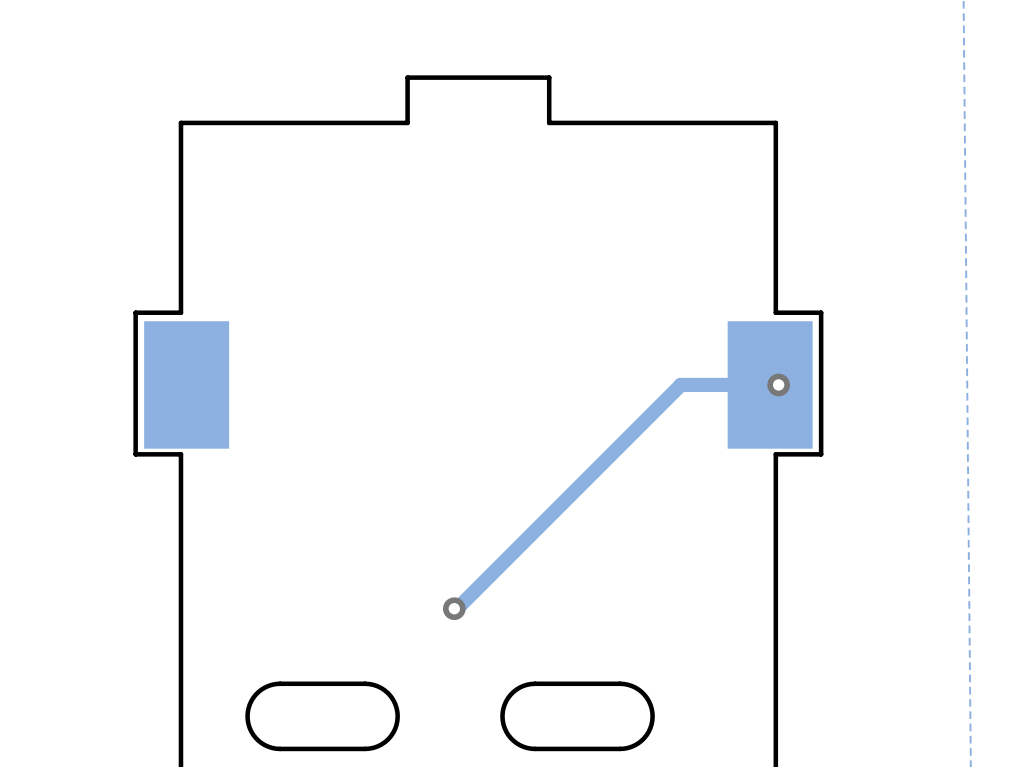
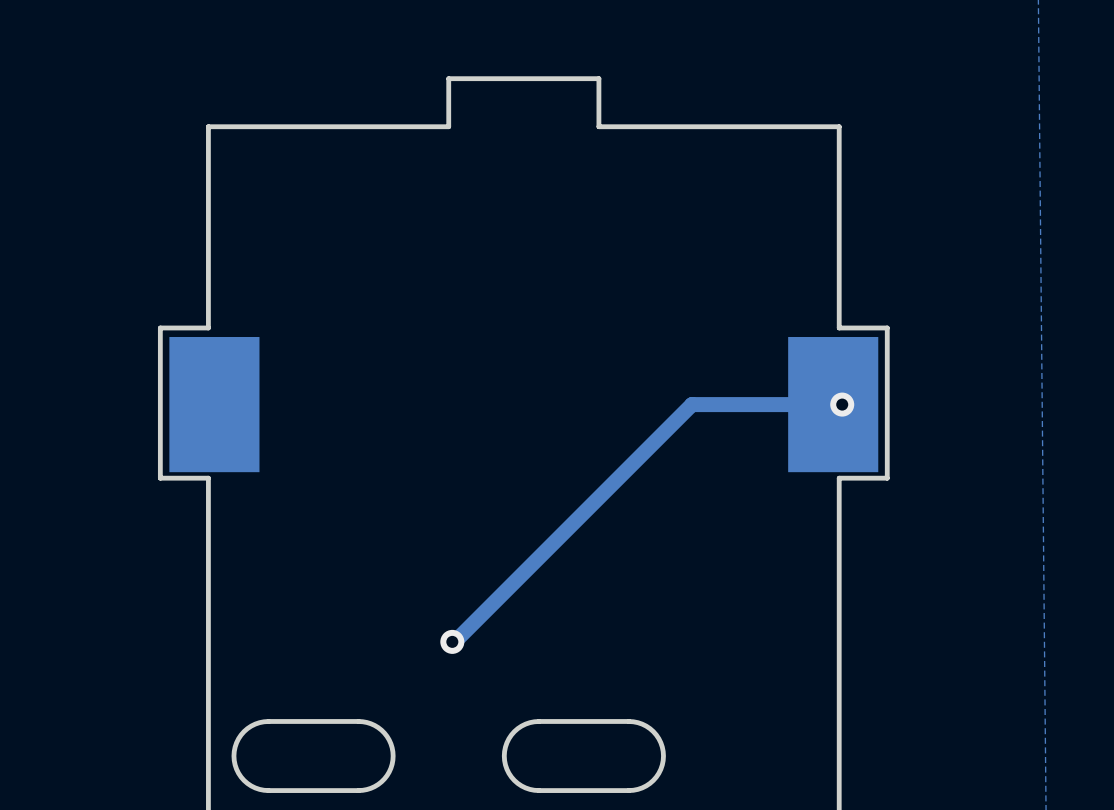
track: (680, 384) (457, 608) (451, 611) -> (738, 404) (692, 404) (454, 641) (454, 644) (451, 644)
via position: (454, 608) -> (452, 641)
board edge: (280, 683) (268, 685) (258, 691) (249, 704) (247, 716) (249, 727) (258, 740) (268, 746) (280, 748) -> (313, 721) (268, 721) (255, 724) (241, 735) (235, 747) (233, 756) (235, 764) (241, 777) (255, 787) (268, 790) (313, 790)
board edge: (322, 683) (365, 683) (377, 686) (390, 696) (395, 703) (397, 716) (395, 728) (390, 736) (377, 746) (365, 748) (322, 748) -> (358, 721) (374, 725) (384, 733) (390, 743) (393, 756) (390, 768) (384, 778) (370, 788) (358, 790)
board edge: (535, 683) (519, 687) (510, 694) (504, 704) (502, 716) (506, 731) (513, 740) (523, 746) (535, 748) -> (583, 721) (538, 721) (525, 724) (511, 735) (506, 742) (504, 756) (506, 769) (511, 777) (525, 787) (538, 790) (583, 790)
board edge: (577, 683) (620, 683) (631, 685) (646, 697) (652, 716) (646, 734) (631, 746) (620, 748) (577, 748) -> (628, 721) (642, 724) (653, 731) (660, 742) (663, 756) (660, 769) (653, 780) (642, 787) (628, 790)

